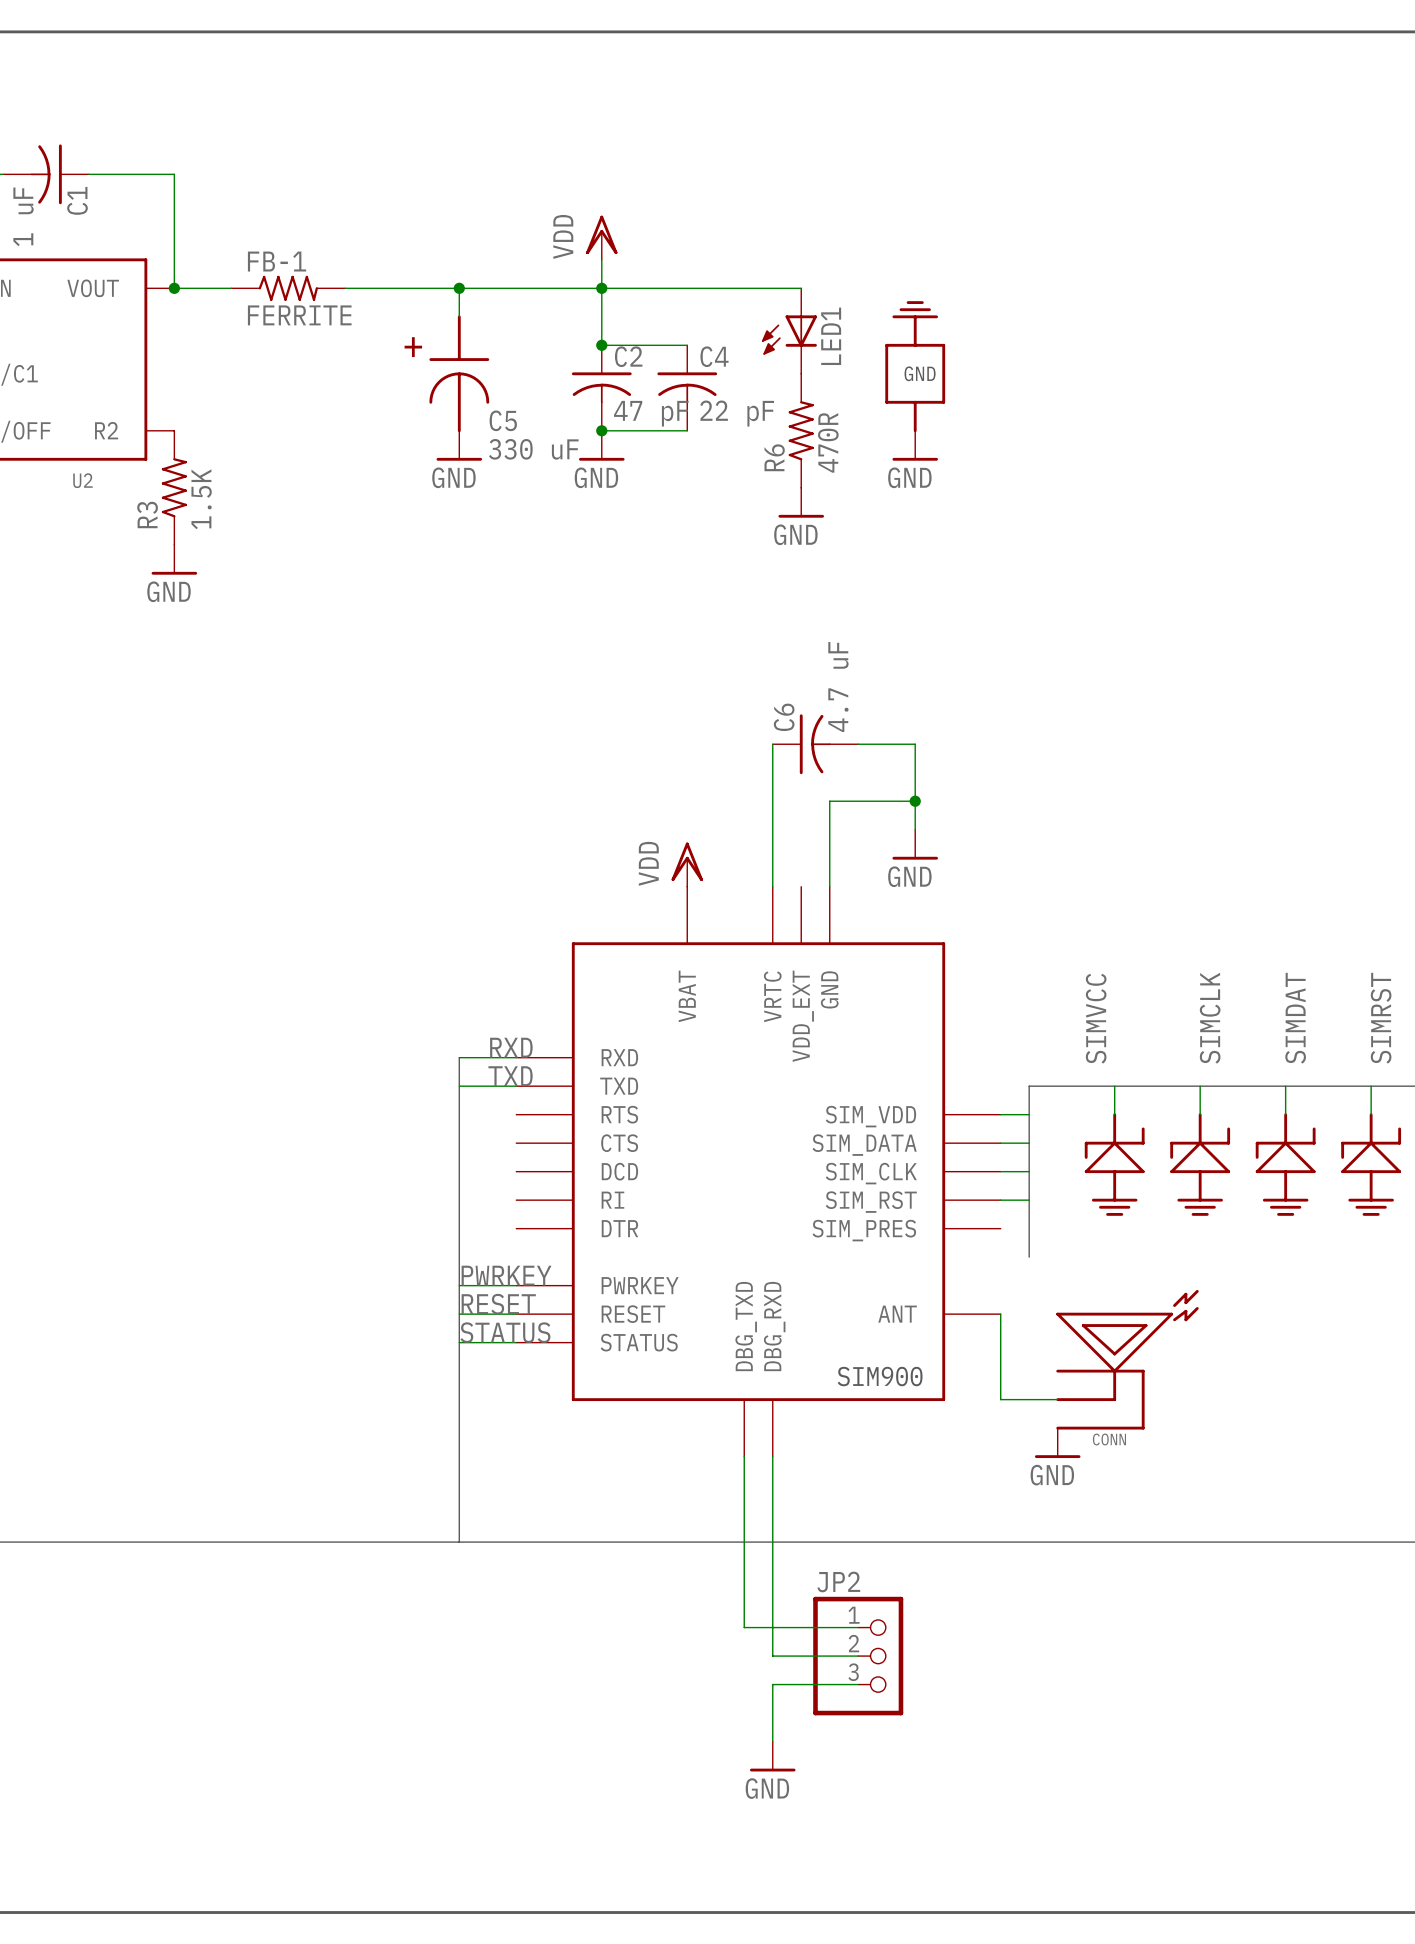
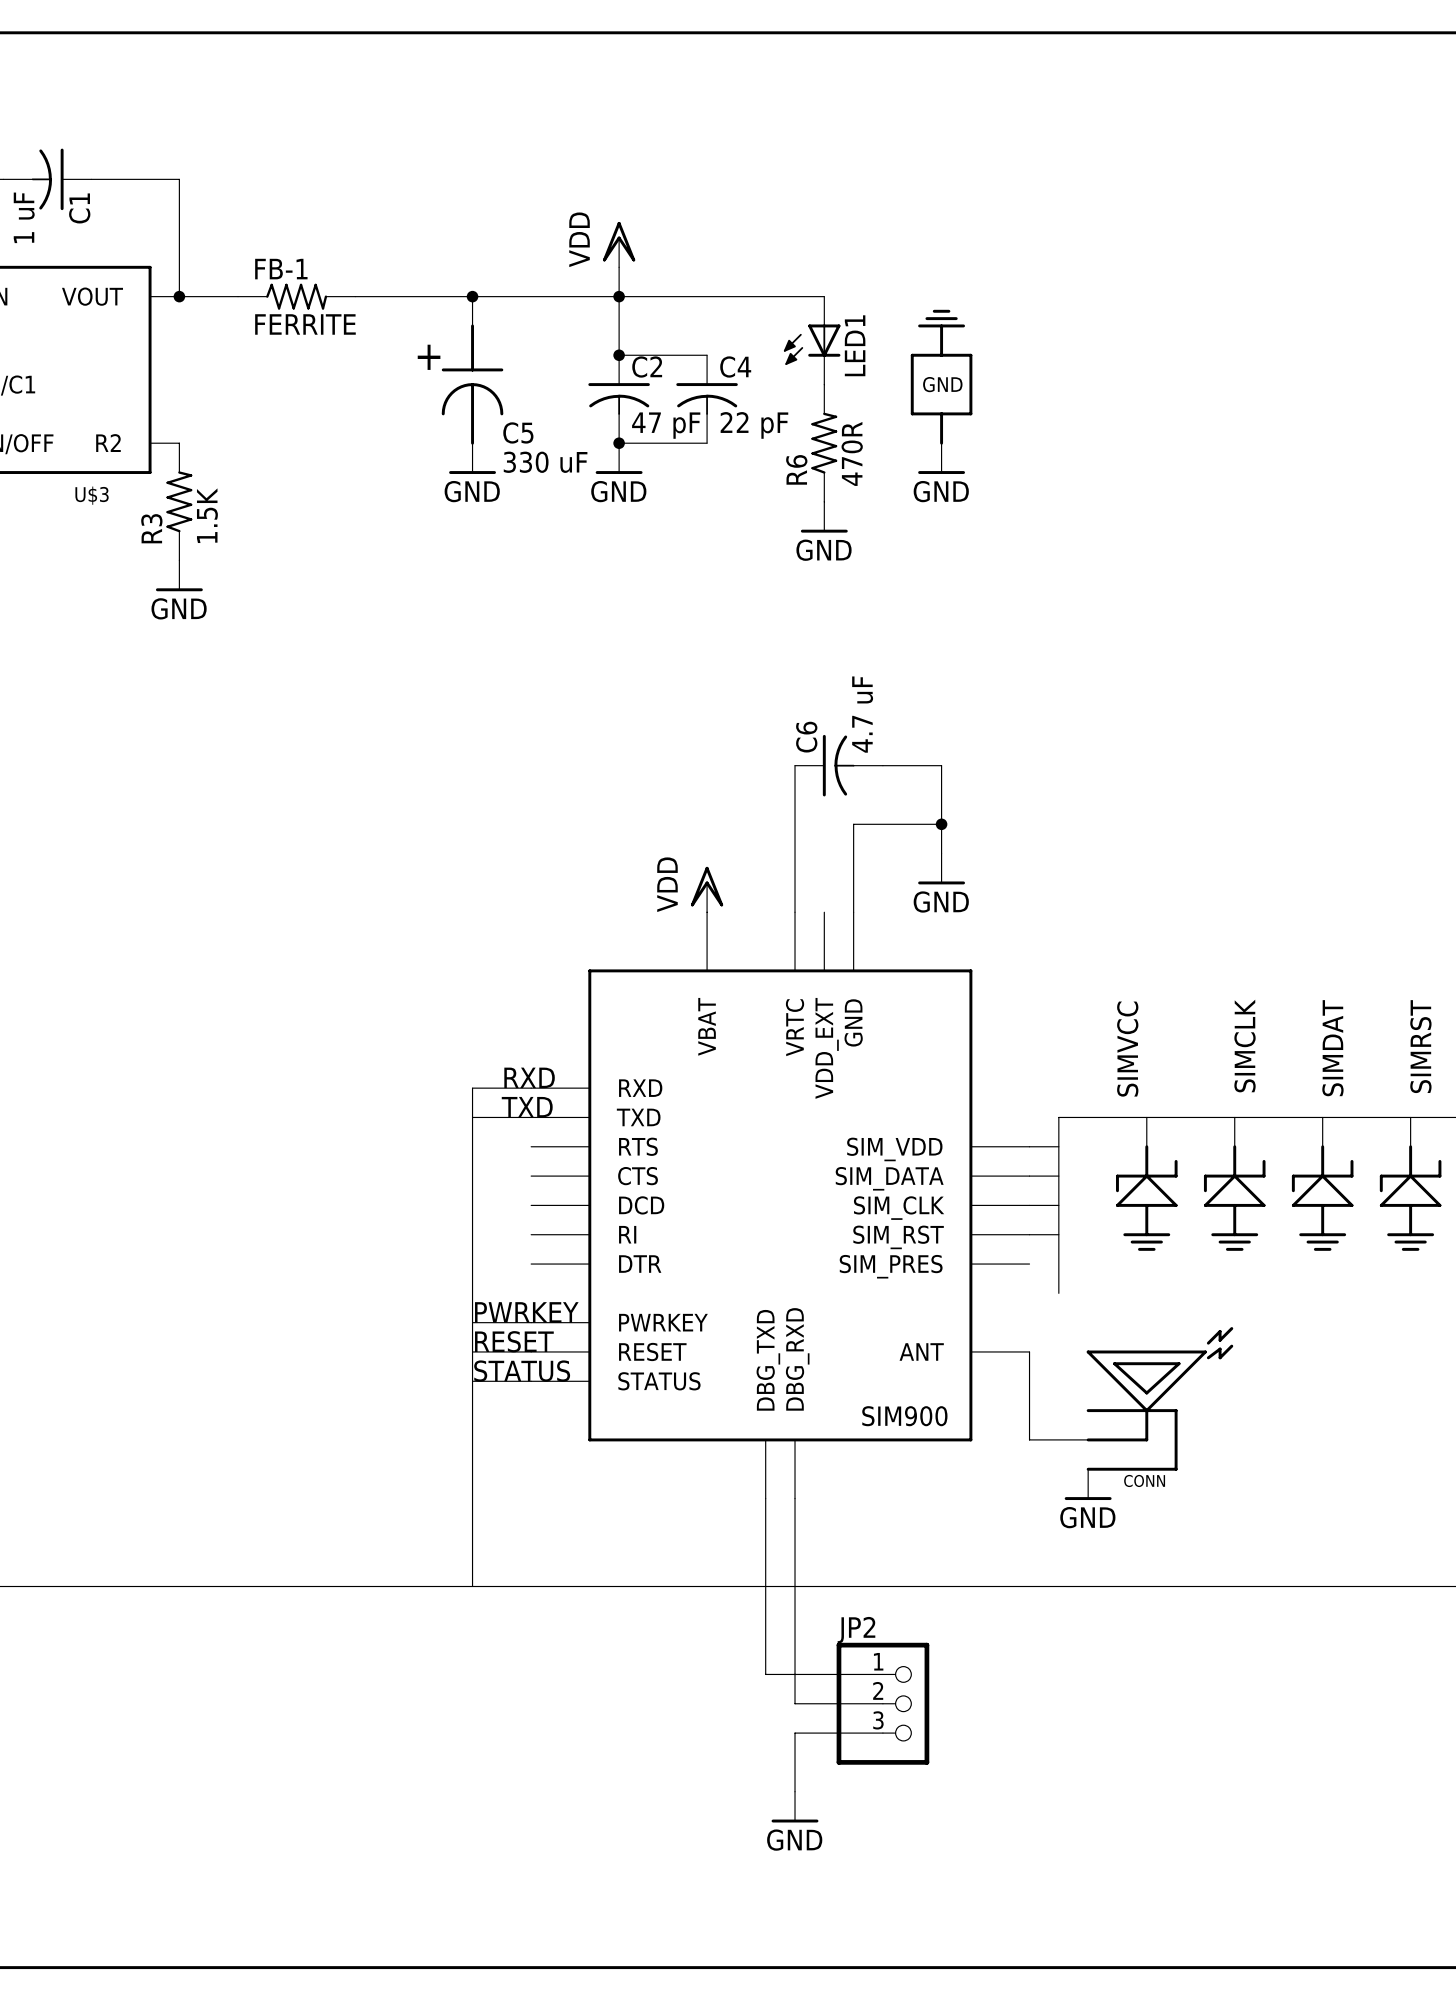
U2 name: U2 (82, 480) -> U$3 (92, 495)

